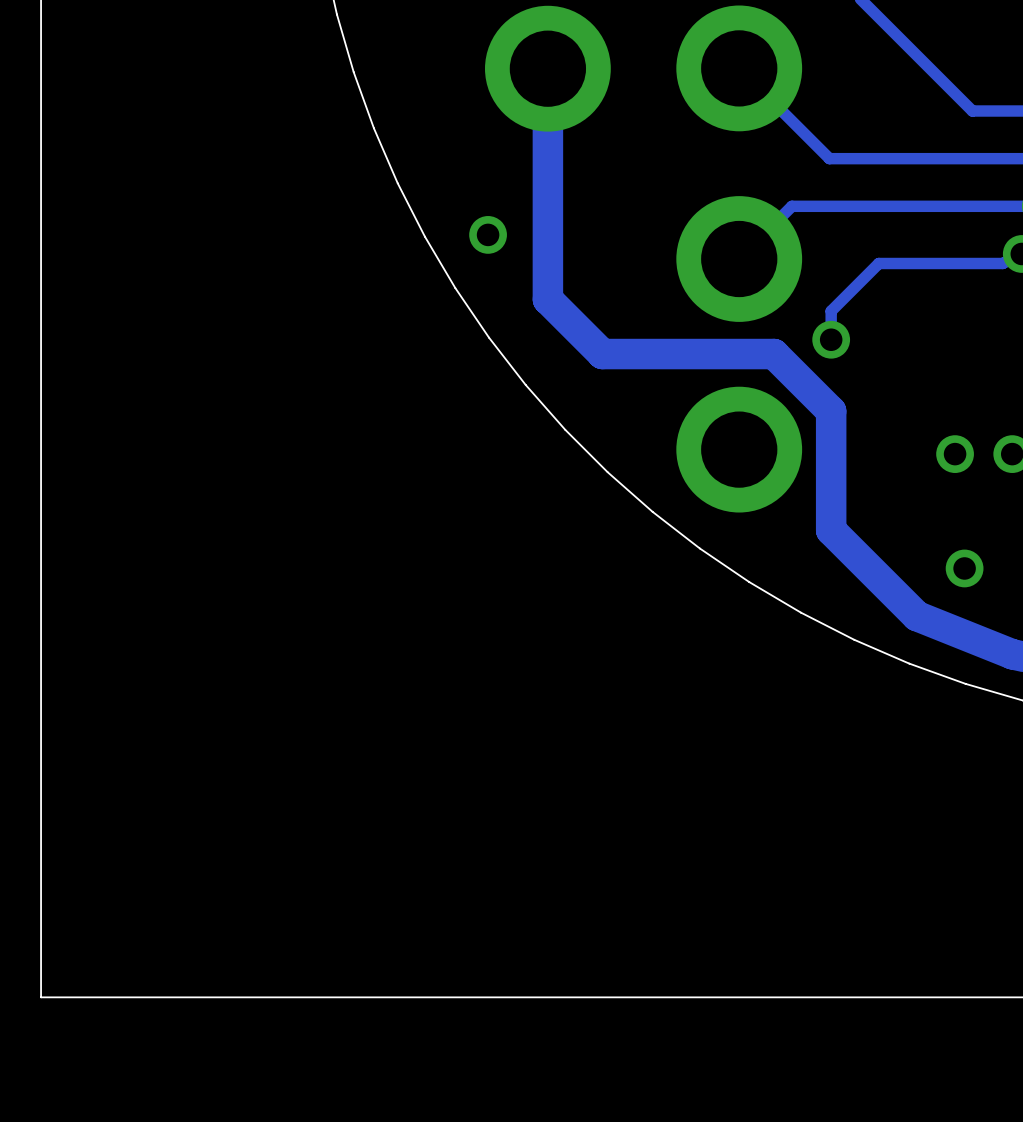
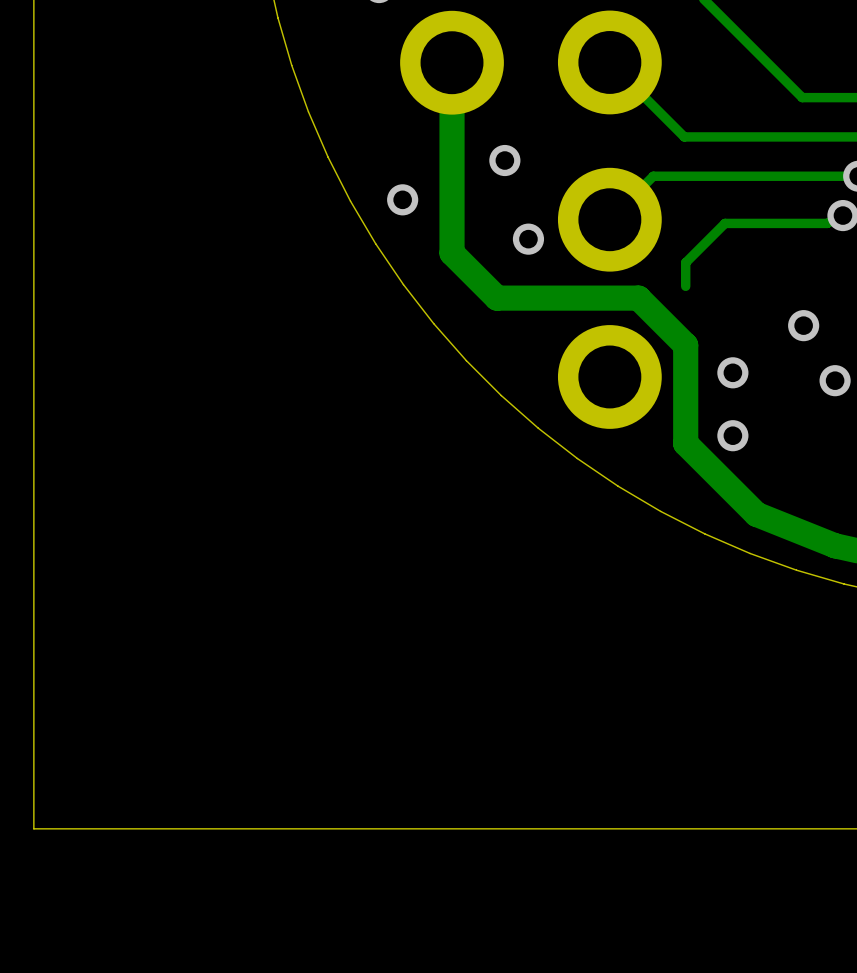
via: none -> (504, 160)
via: none -> (528, 239)
via: (831, 339) -> none
via: none -> (803, 325)
via: none -> (732, 372)
via: (955, 454) -> none
via: none -> (732, 435)
via: (964, 568) -> none

